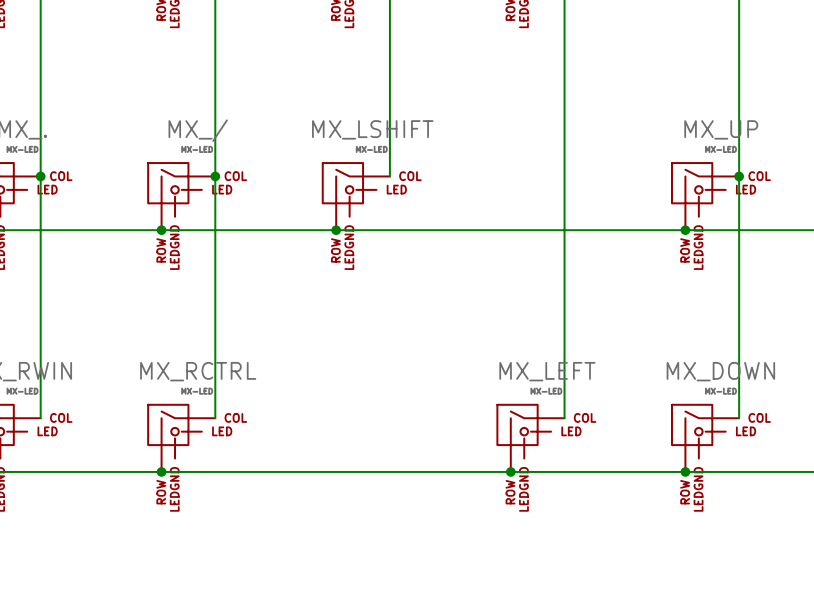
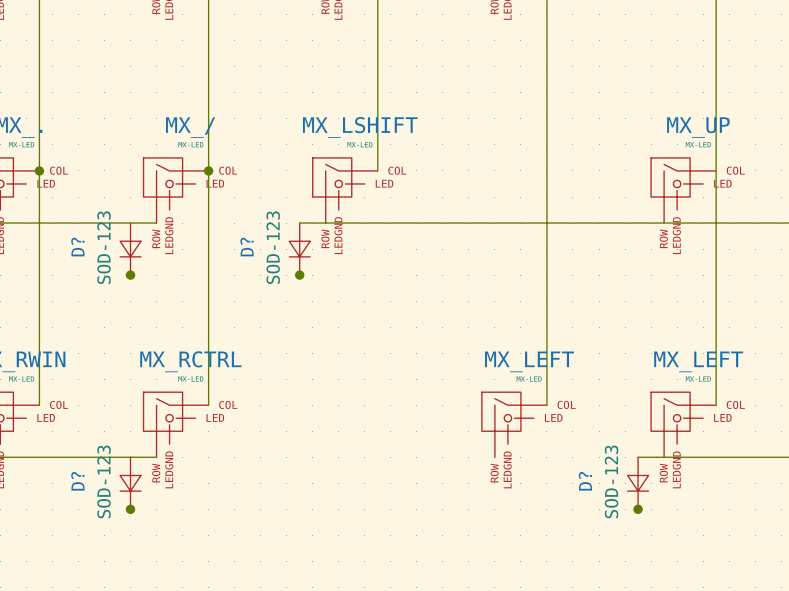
junction: (739, 176) -> none
wire: (161, 230) (309, 230) -> none
junction position: (161, 230) -> (130, 275)
junction position: (336, 230) -> (299, 275)
junction: (685, 230) -> none
D?: none -> SOD-123 (130, 249)
D?: none -> SOD-123 (299, 249)
MX_DOWN name: MX_DOWN (720, 371) -> MX_LEFT (698, 361)
wire: (161, 471) (658, 471) -> none
junction position: (161, 471) -> (130, 509)
junction: (510, 471) -> none
junction position: (685, 471) -> (638, 509)
D?: none -> SOD-123 (130, 483)
D?: none -> SOD-123 (638, 483)

